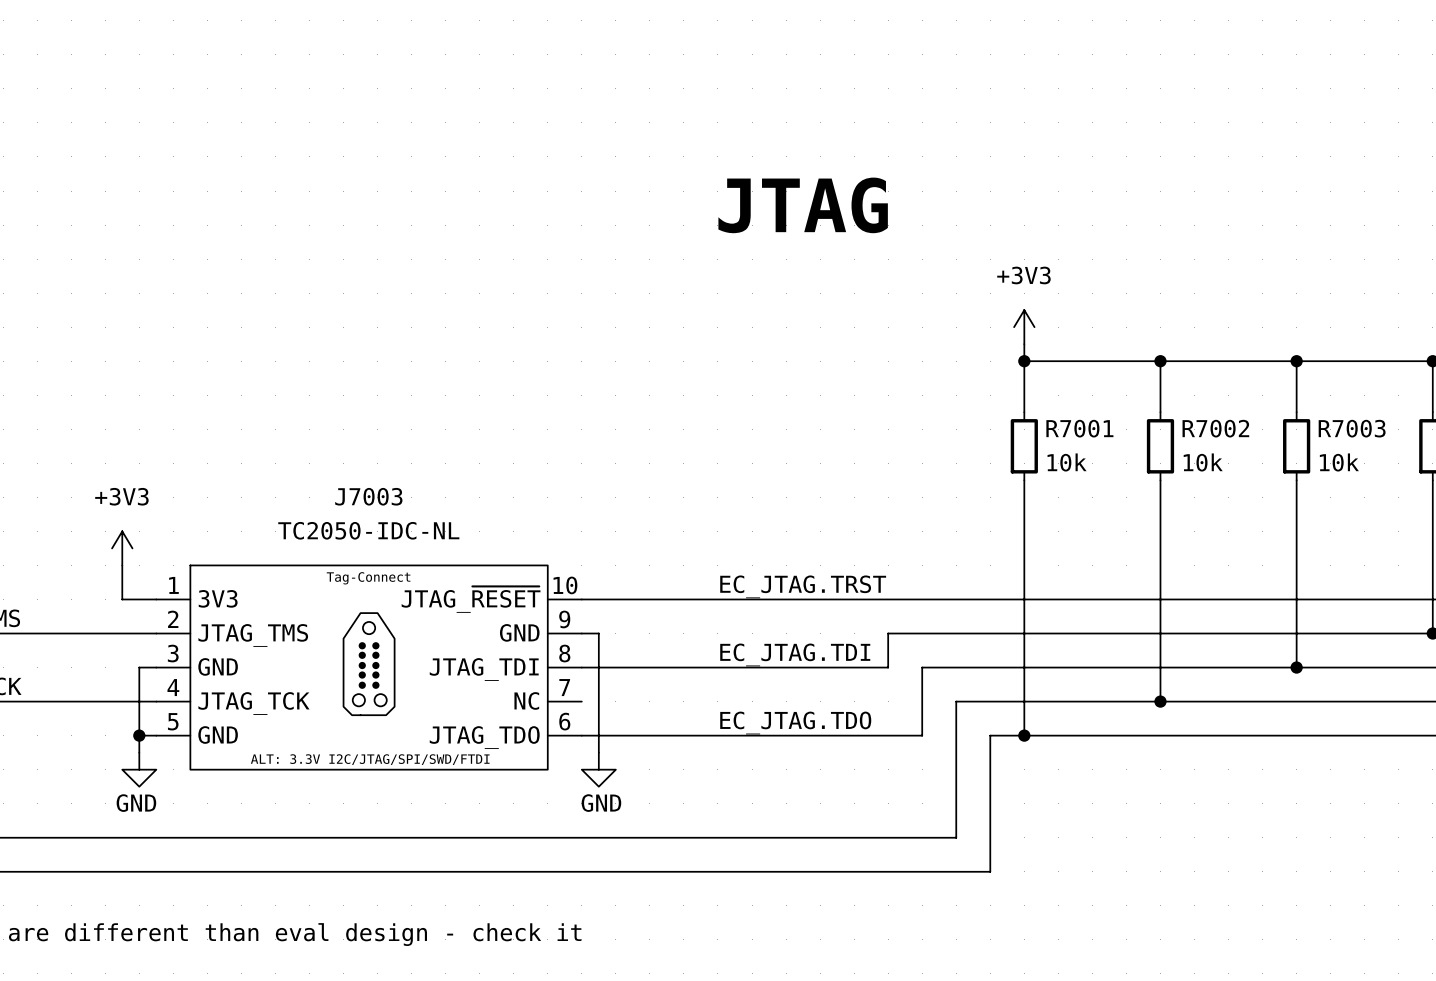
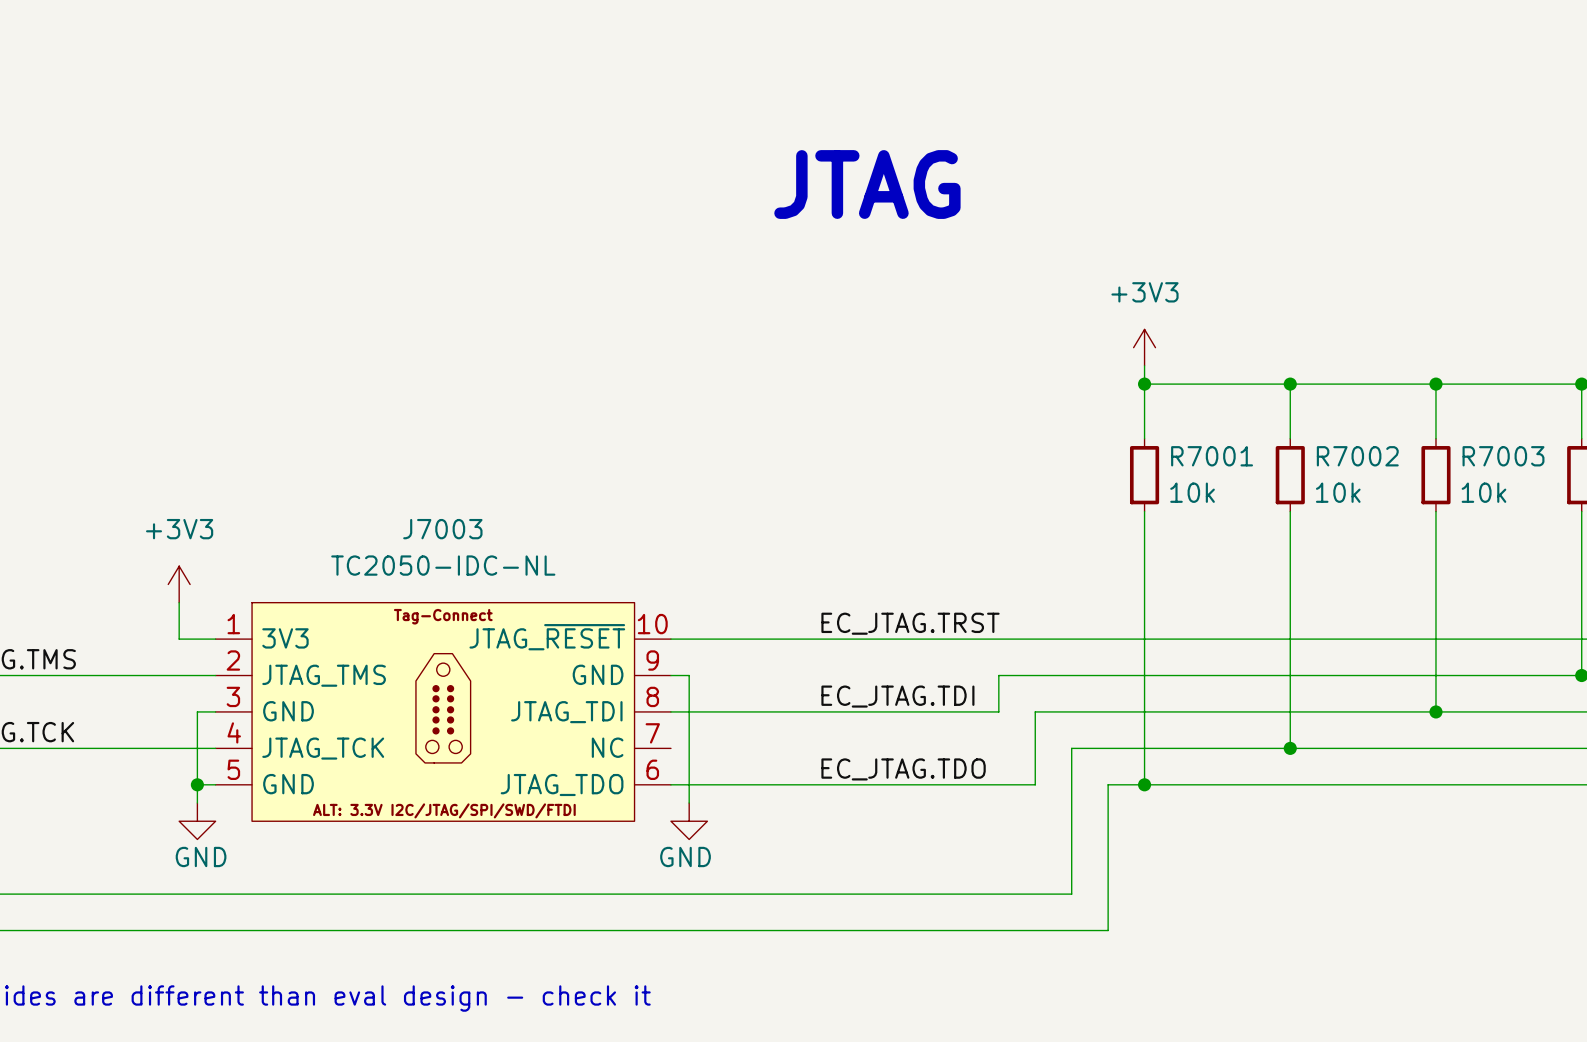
text position: JTAG (803, 205) -> JTAG (867, 184)

